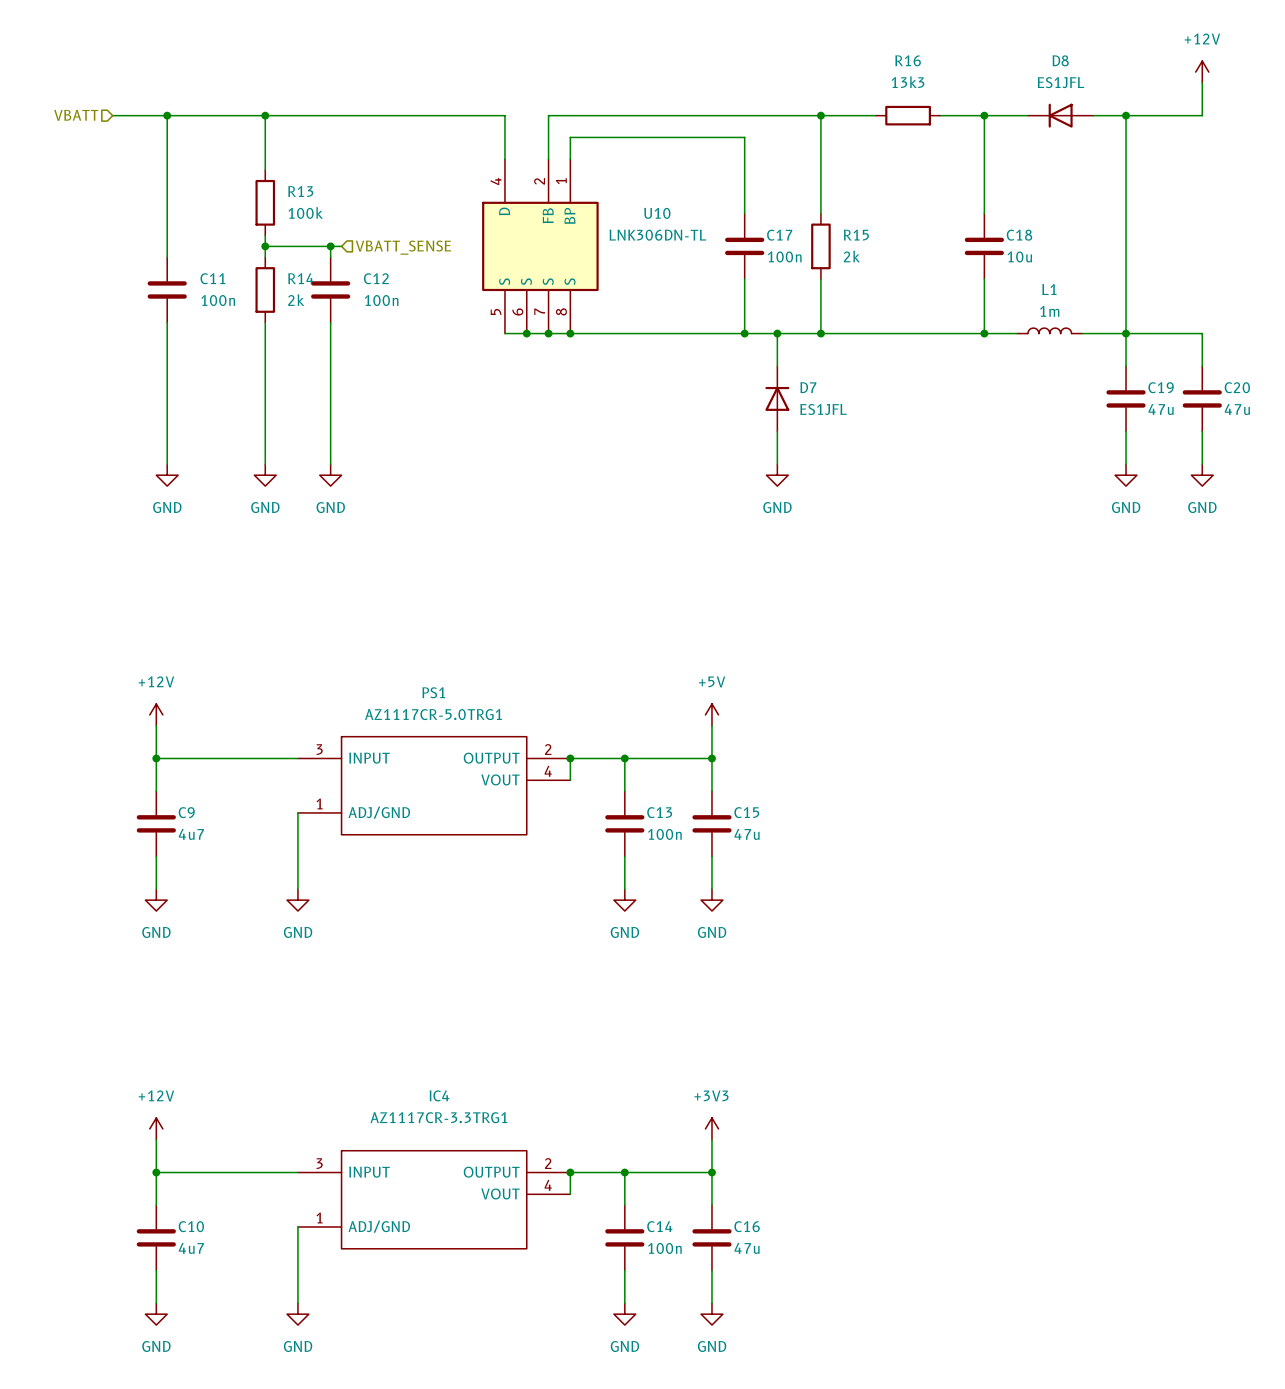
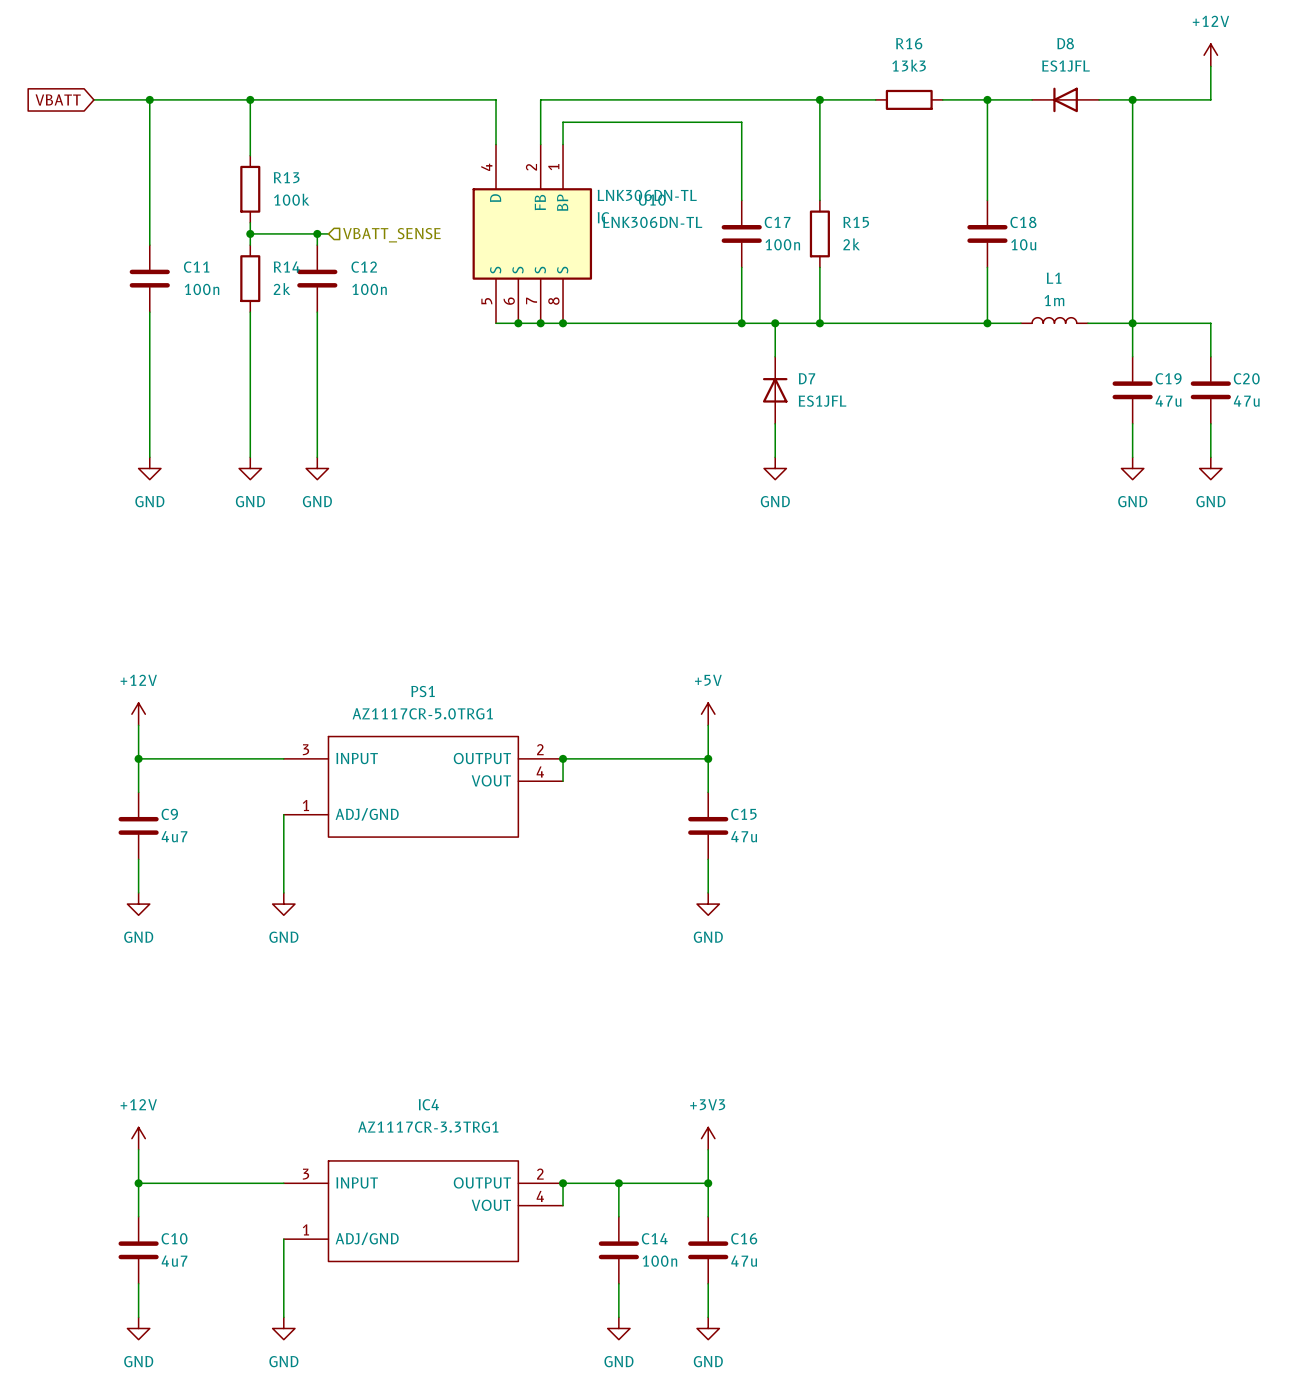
hierarchical label: VBATT (76, 115) -> none
global label: none -> VBATT (58, 99)
U10 text: none -> LNK306DN-TL (647, 195)
U10 text: none -> IC (603, 217)
wire: (624, 758) (624, 791) -> none
junction: (624, 758) -> none
C13: 100n (624, 823) -> none
wire: (624, 856) (624, 889) -> none
power symbol: GND (624, 900) -> none

